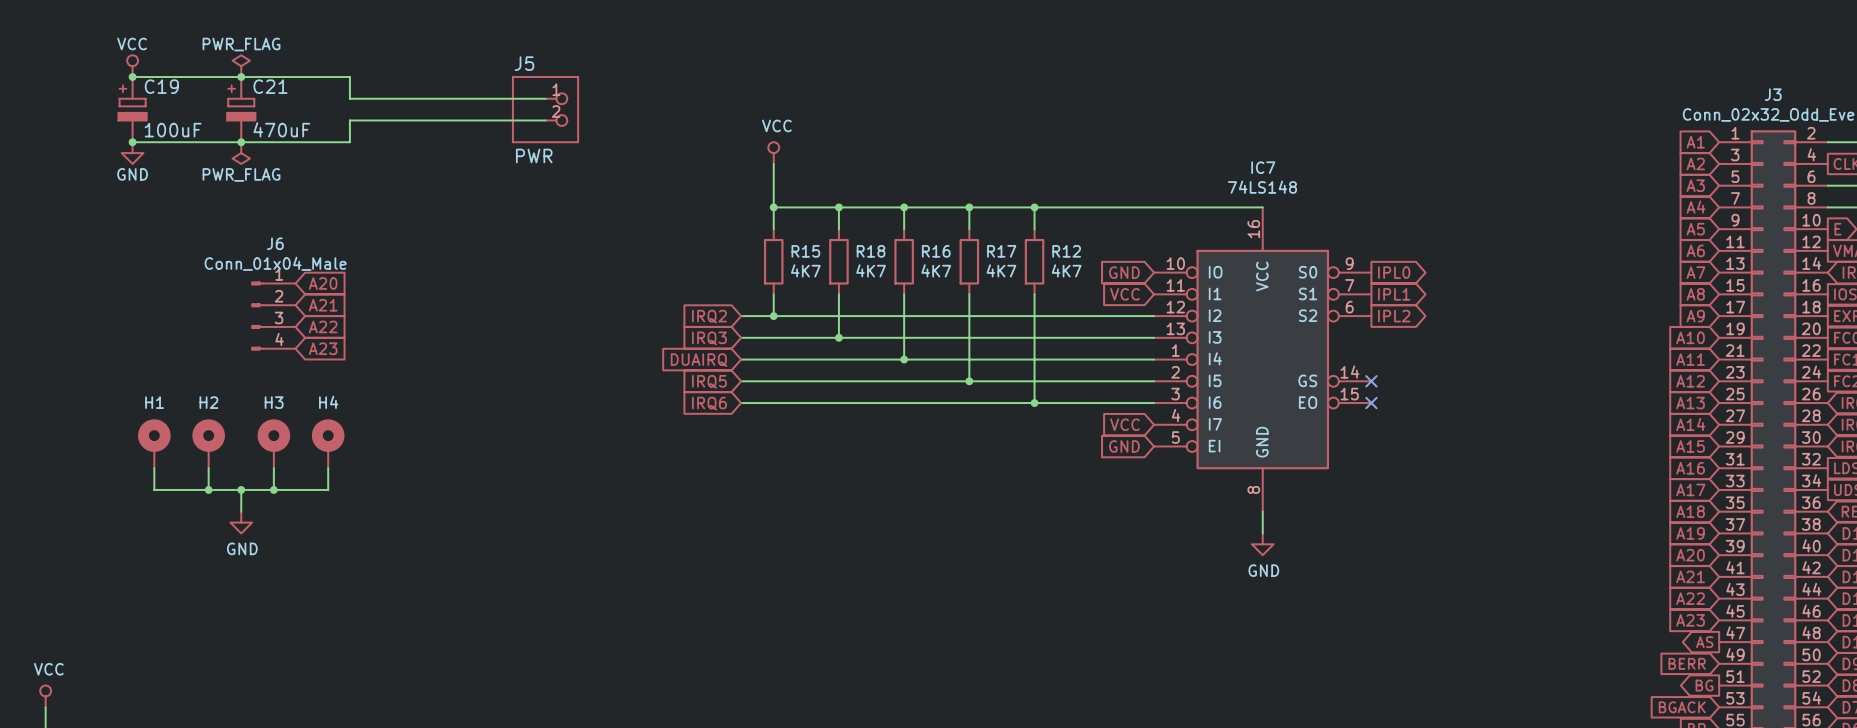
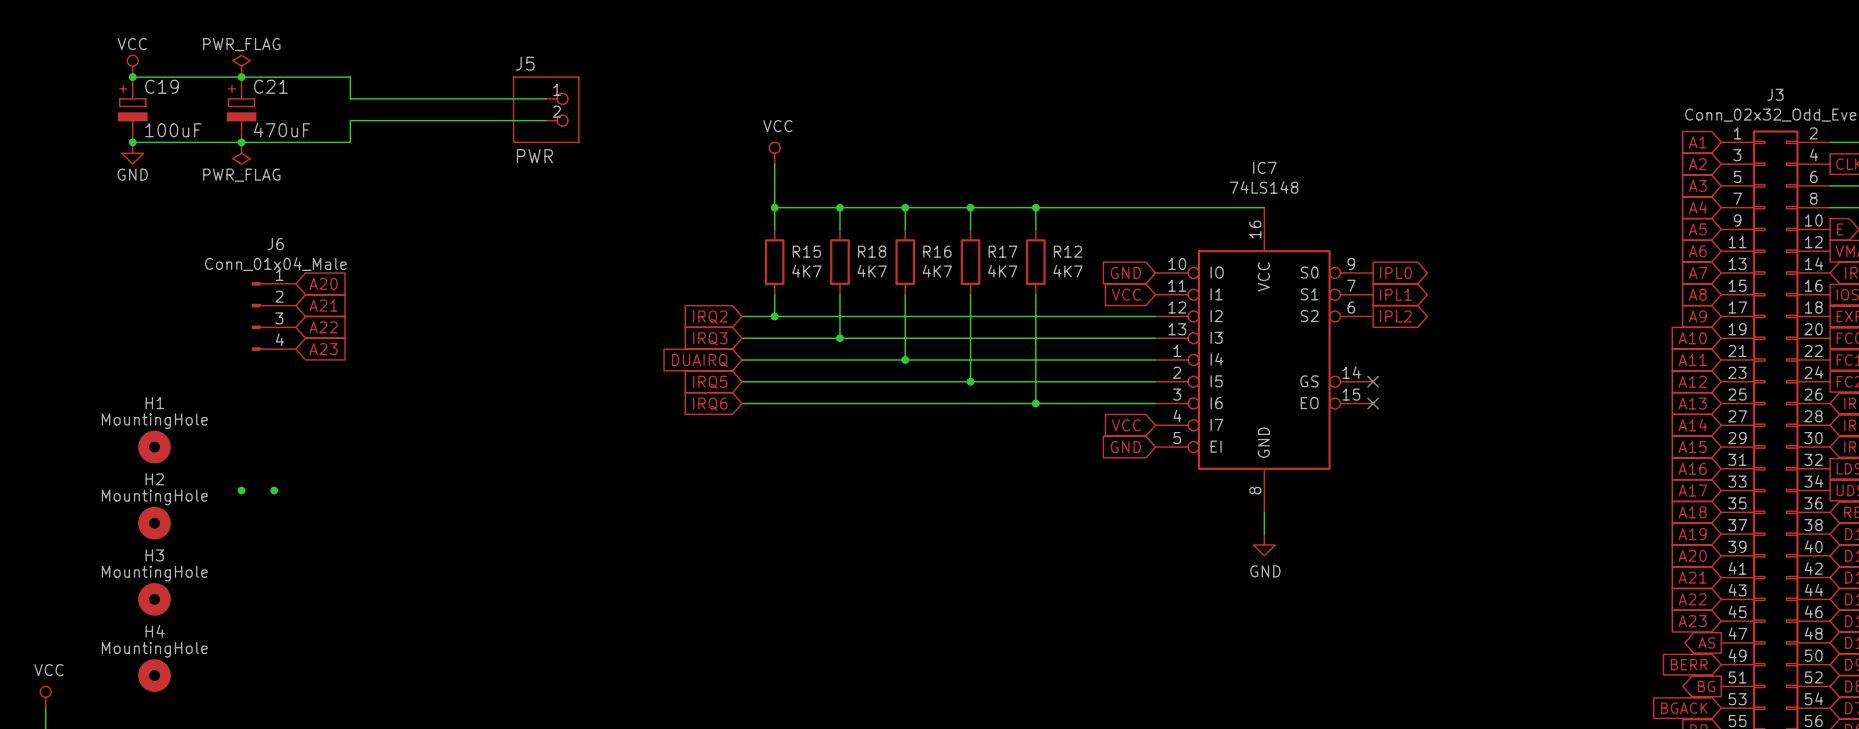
H1 symbol: [138, 419, 171, 469] -> [138, 430, 171, 464]
H2 symbol: [192, 419, 225, 469] -> [138, 506, 171, 540]
H3 symbol: [257, 419, 291, 469] -> [138, 583, 171, 616]
H4 symbol: [311, 419, 345, 469] -> [138, 659, 171, 692]
H1 value: none -> MountingHole (154, 421)
wire: (154, 468) (154, 489) (328, 489) (328, 468) -> none
wire: (208, 468) (208, 489) -> none
wire: (273, 468) (273, 489) -> none
junction: (208, 489) -> none
wire: (241, 489) (241, 511) -> none
H2 value: none -> MountingHole (154, 497)
power symbol: GND (241, 522) -> none
H3 value: none -> MountingHole (154, 573)
H4 value: none -> MountingHole (154, 649)

